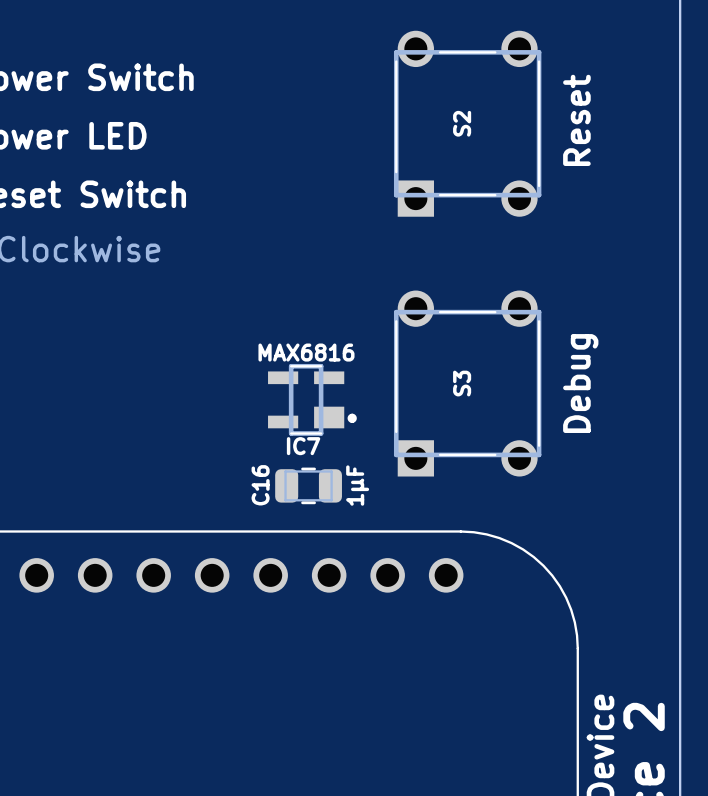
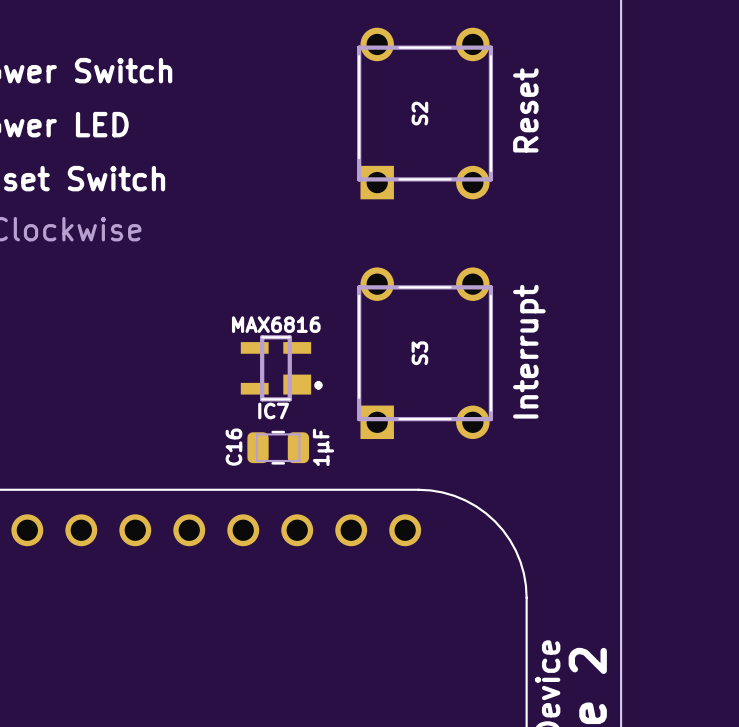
text: Debug (580, 383) -> Interrupt (529, 351)

